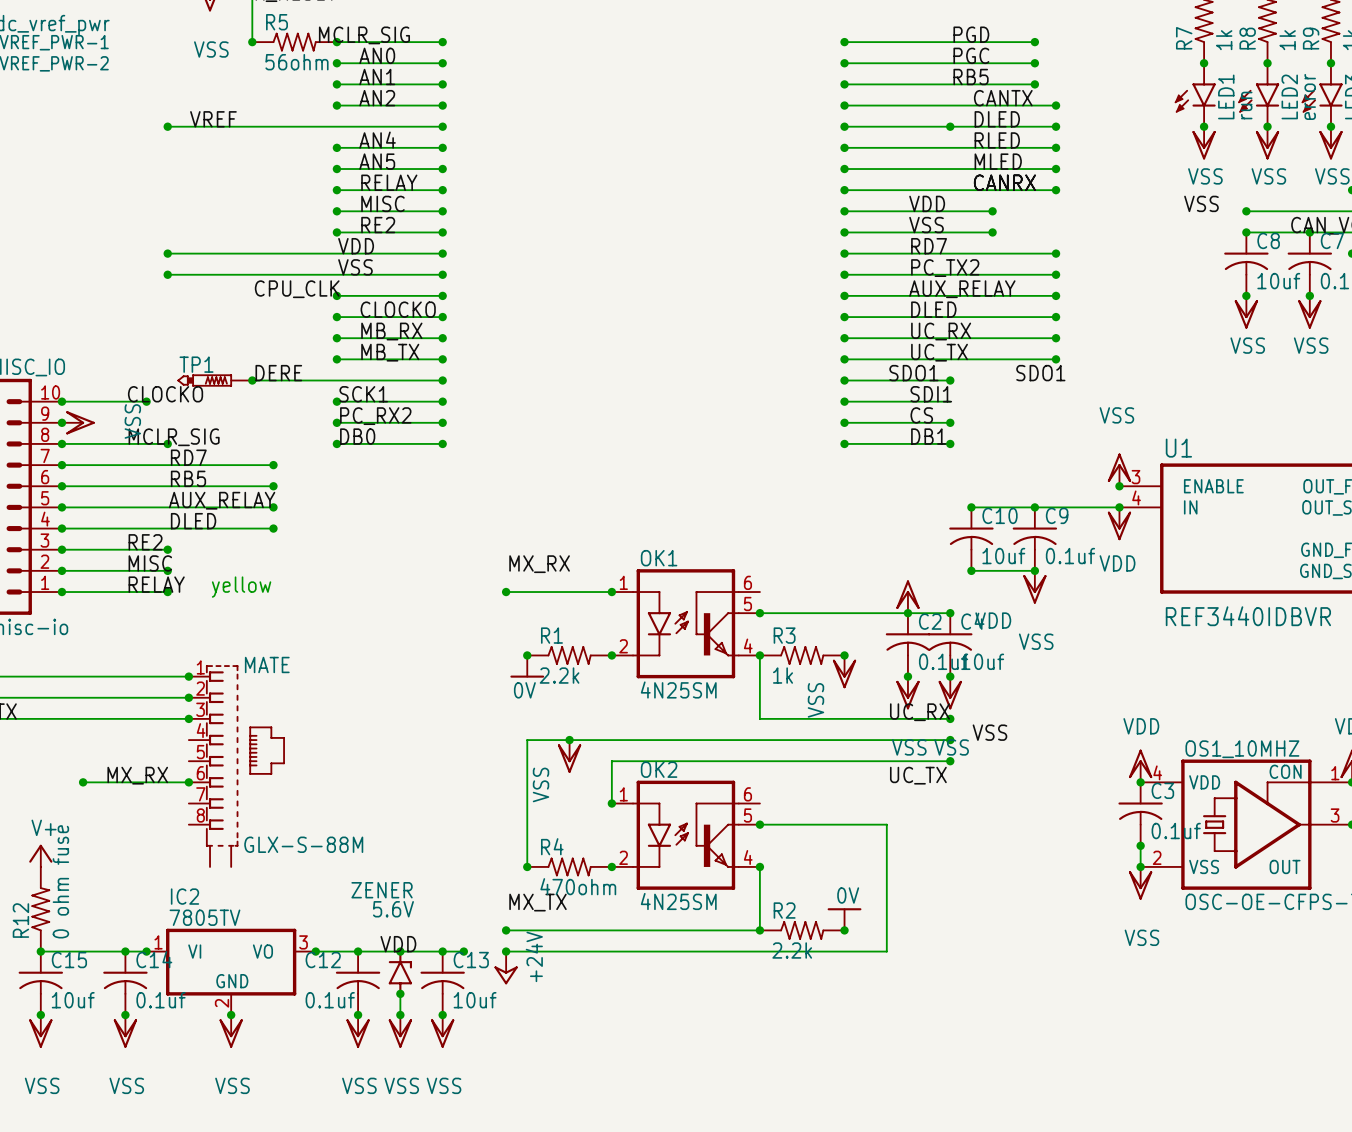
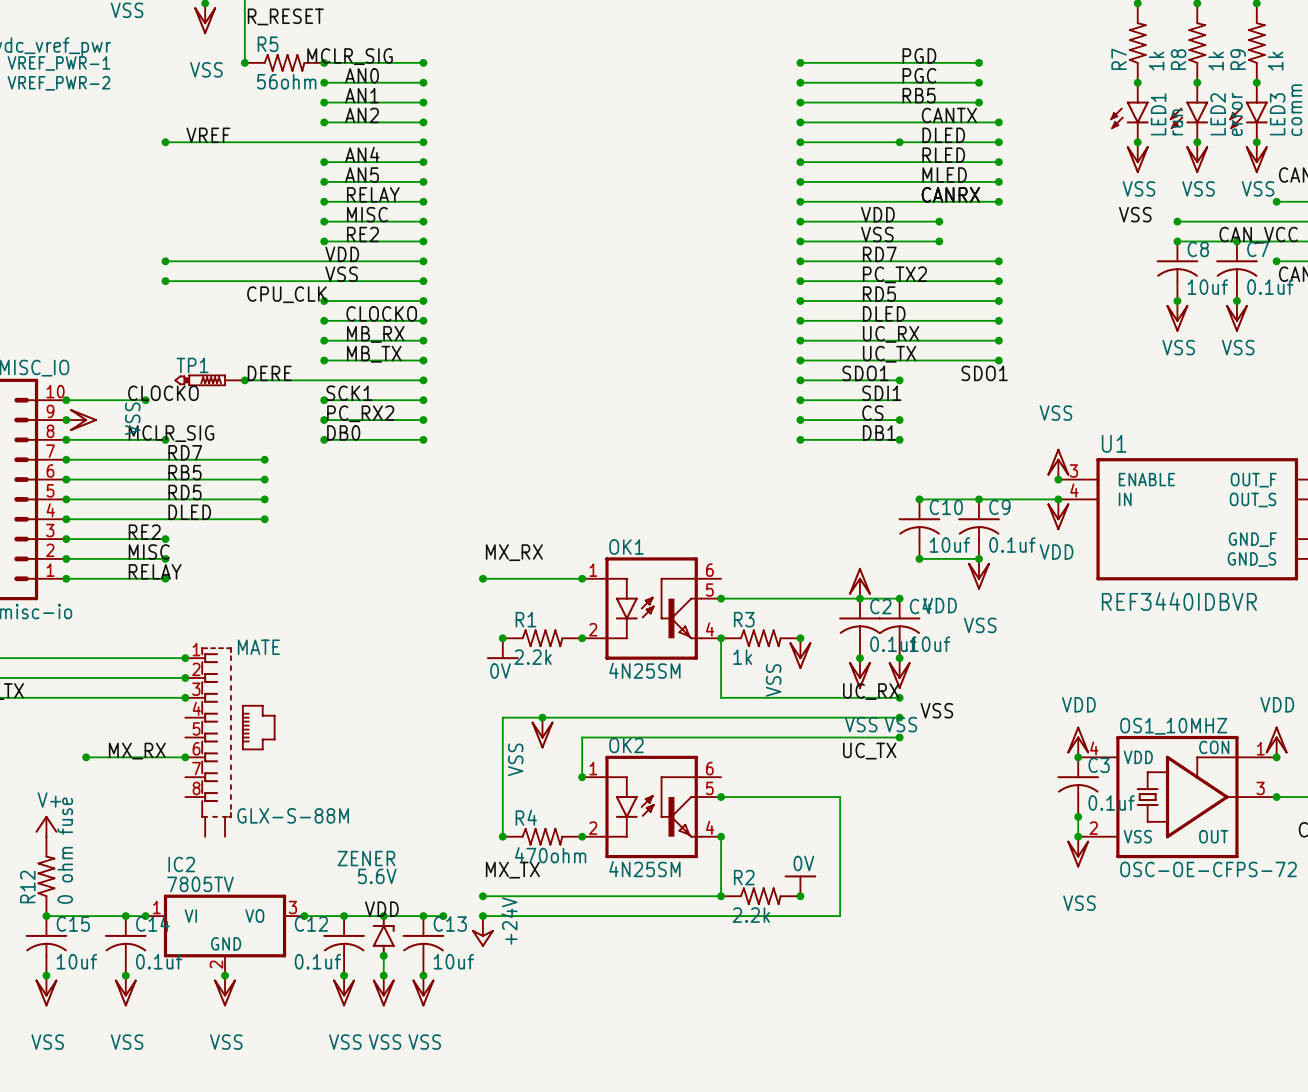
label: AUX_RELAY (962, 289) -> RD5 (879, 294)
label: AUX_RELAY (222, 500) -> RD5 (184, 492)
text: yellow (241, 587) -> none

